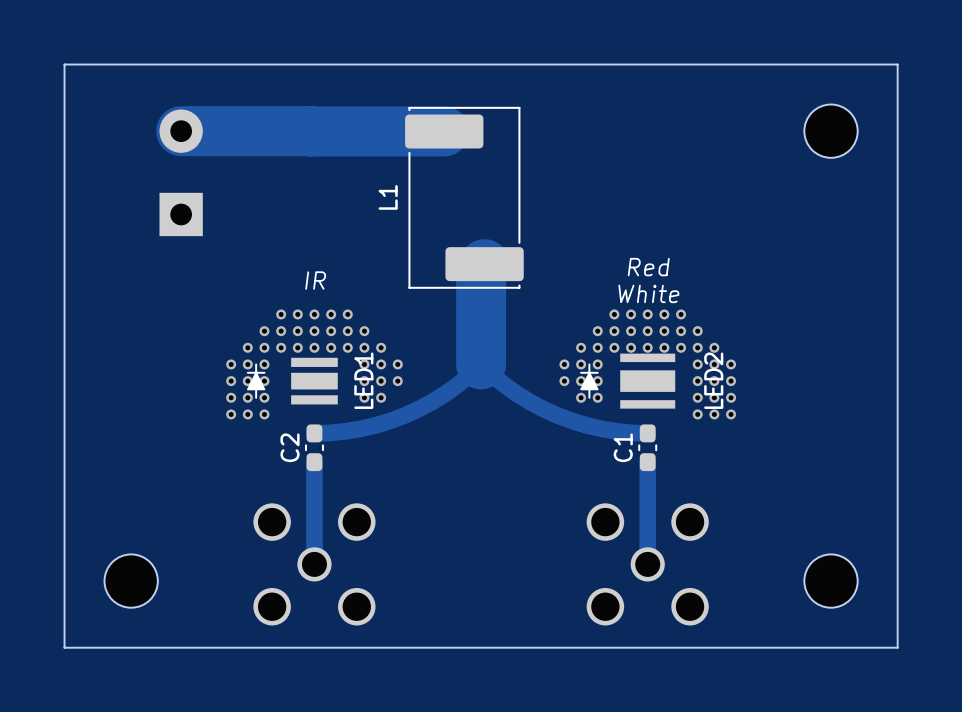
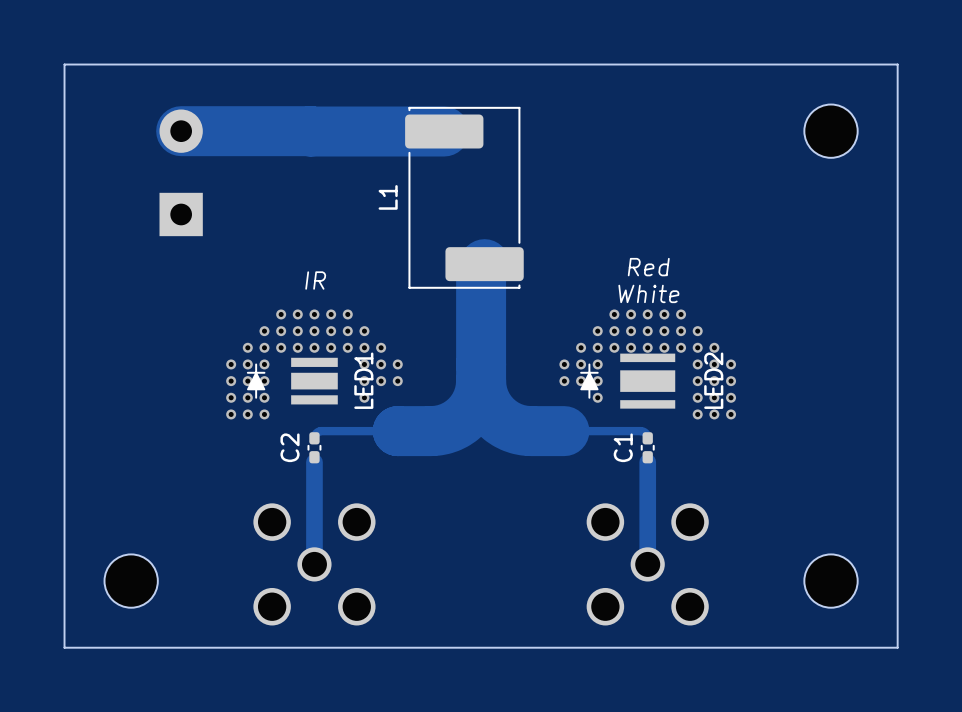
track: none -> (481, 381) (479, 394) (474, 406) (466, 416) (450, 427) (431, 431) (320, 431) (316, 433) (314, 438)
track: none -> (481, 381) (484, 400) (491, 411) (500, 420) (511, 427) (531, 431) (641, 431) (645, 433) (647, 438)
via: (381, 397) -> none
via: (581, 397) -> none
C2 footprint: [304, 424, 324, 472] -> [307, 432, 322, 464]
C1 footprint: [638, 424, 658, 472] -> [640, 432, 655, 464]
track: (314, 433) (360, 428) (404, 415) (445, 393) (481, 364) (516, 393) (557, 415) (601, 428) (647, 433) -> none

